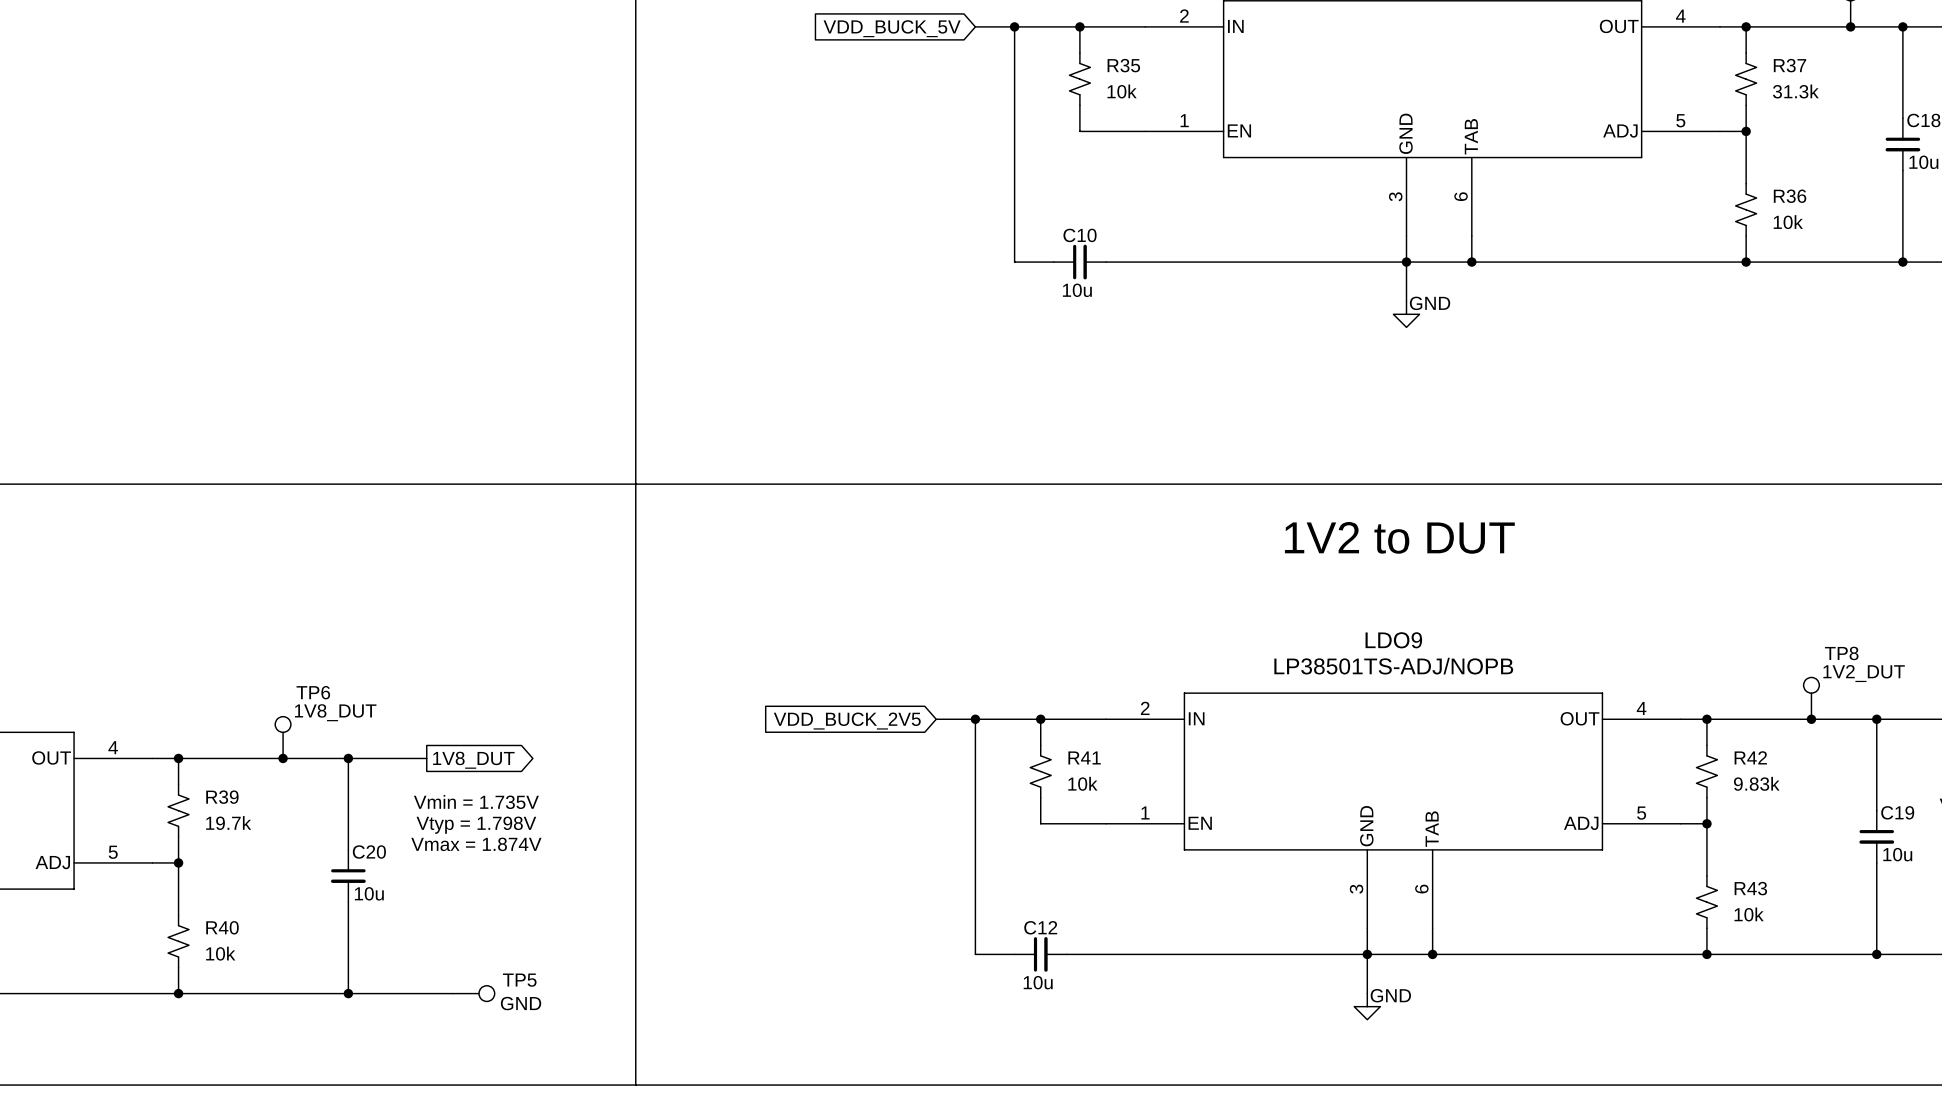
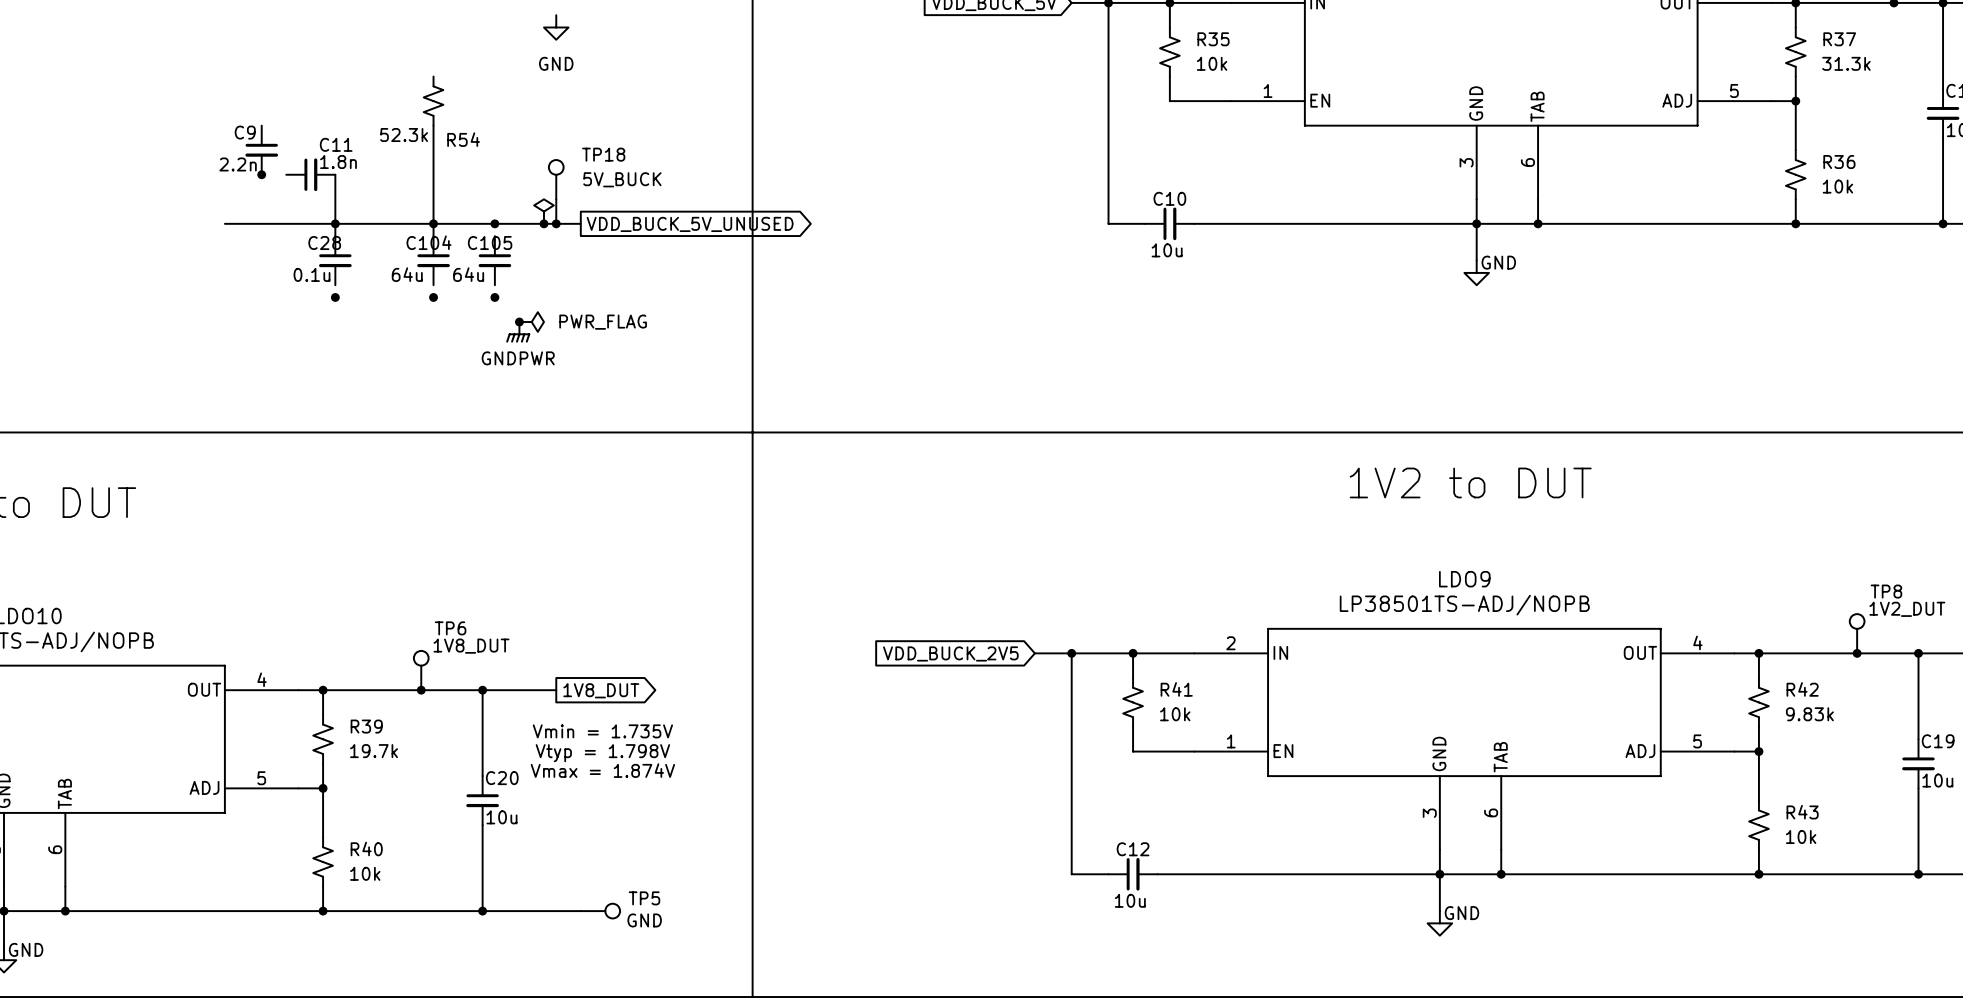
power symbol: none -> GND (556, 27)
R54: none -> 52.3k (433, 101)
wire: none -> (433, 125) (433, 236)
C9: none -> 2.2n (261, 150)
junction: none -> (261, 174)
C11: none -> 1.8n (310, 174)
wire: none -> (335, 174) (335, 236)
TP18: none -> 5V_BUCK (556, 179)
wire: none -> (556, 199) (556, 223)
power symbol: none -> (543, 211)
wire: none -> (224, 223) (580, 223)
junction: none -> (335, 223)
junction: none -> (433, 223)
junction: none -> (494, 223)
junction: none -> (543, 223)
junction: none -> (556, 223)
global label: none -> VDD_BUCK_5V_UNUSED (690, 224)
C28: none -> 0.1u (335, 260)
C104: none -> 64u (433, 260)
C105: none -> 64u (494, 260)
junction: none -> (335, 297)
junction: none -> (433, 297)
junction: none -> (494, 297)
junction: none -> (519, 322)
power symbol: none -> PWR_FLAG (531, 322)
power symbol: none -> GNDPWR (518, 332)

